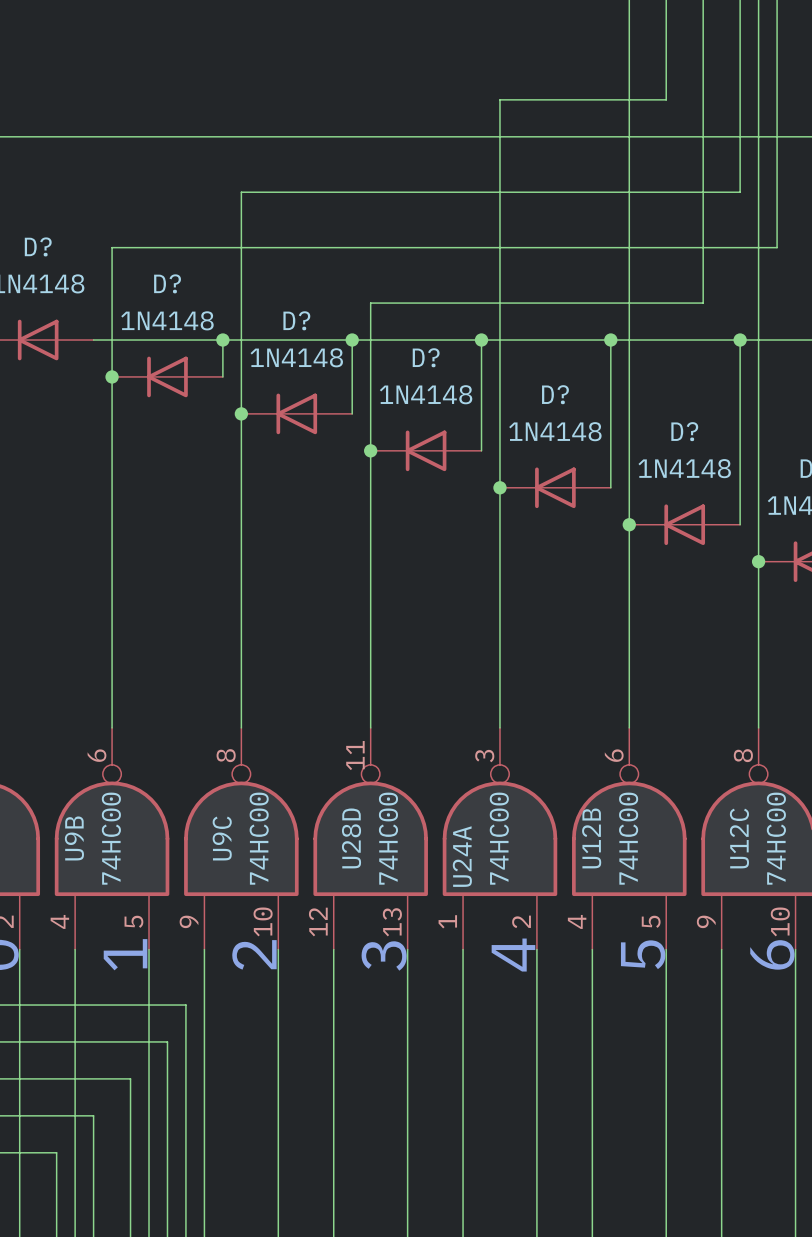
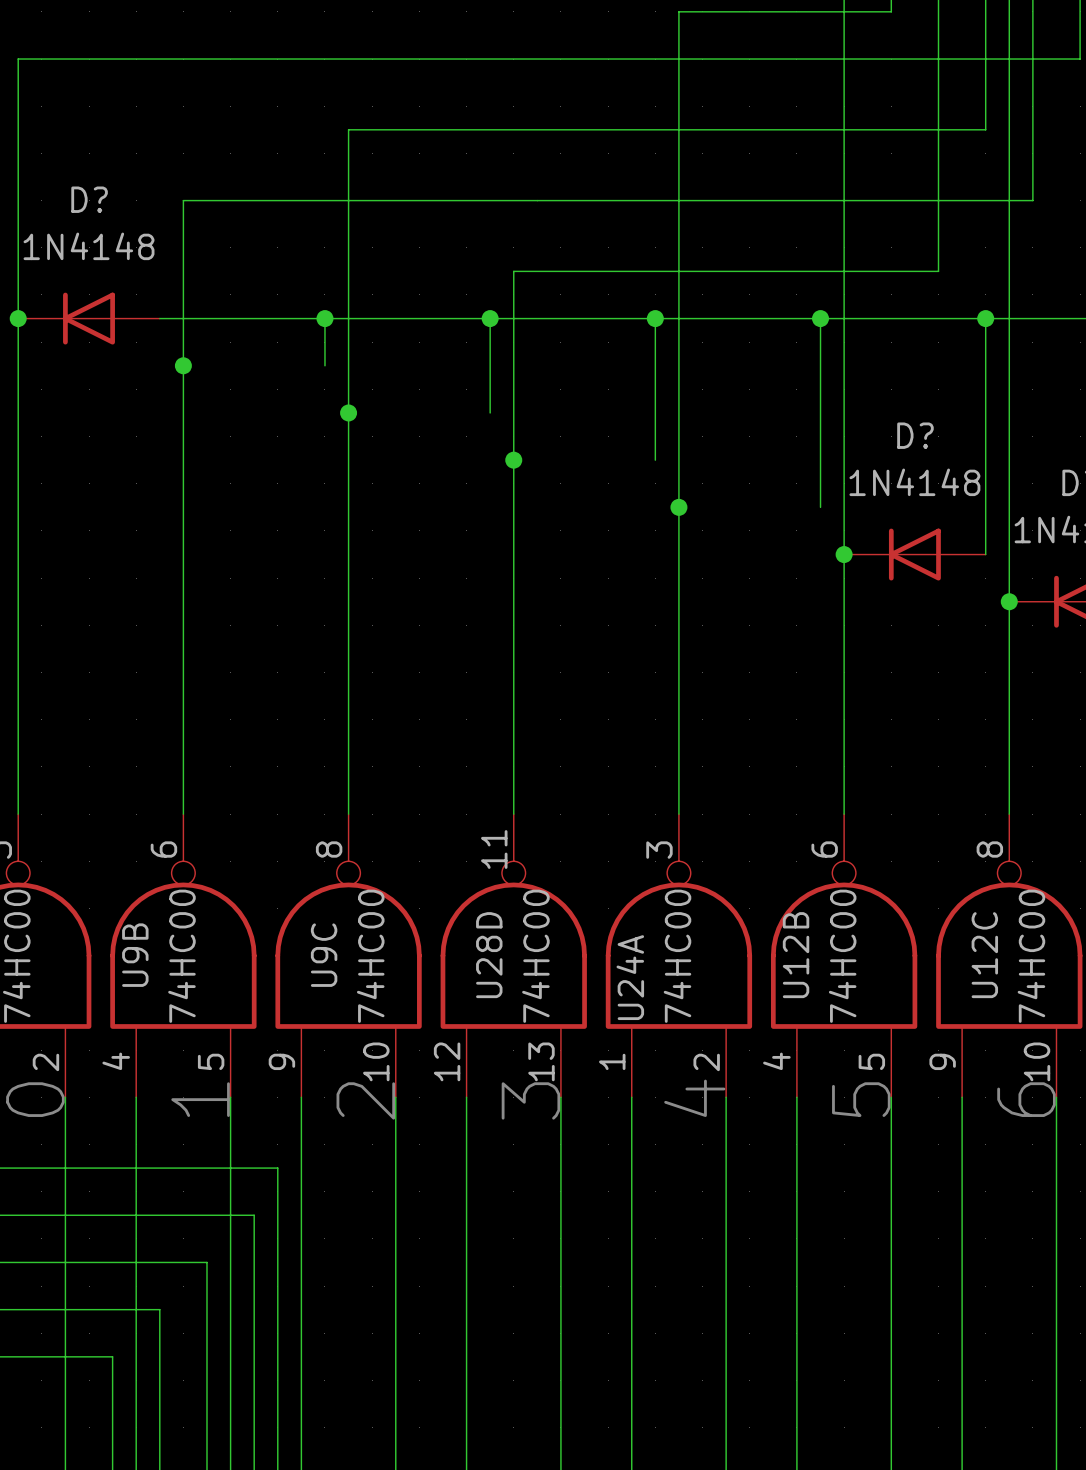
D?: 1N4148 (167, 376) -> none
D?: 1N4148 (296, 413) -> none
D?: 1N4148 (426, 450) -> none
D?: 1N4148 (555, 487) -> none

